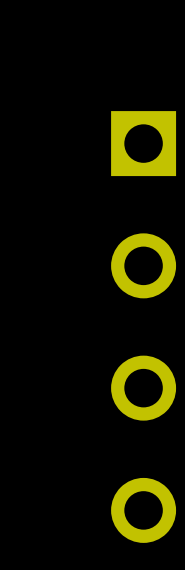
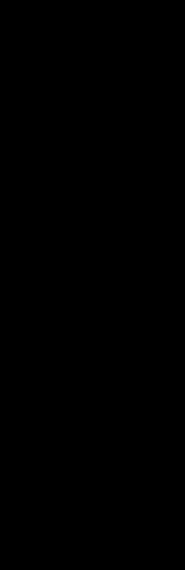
part: (143, 326) -> none

